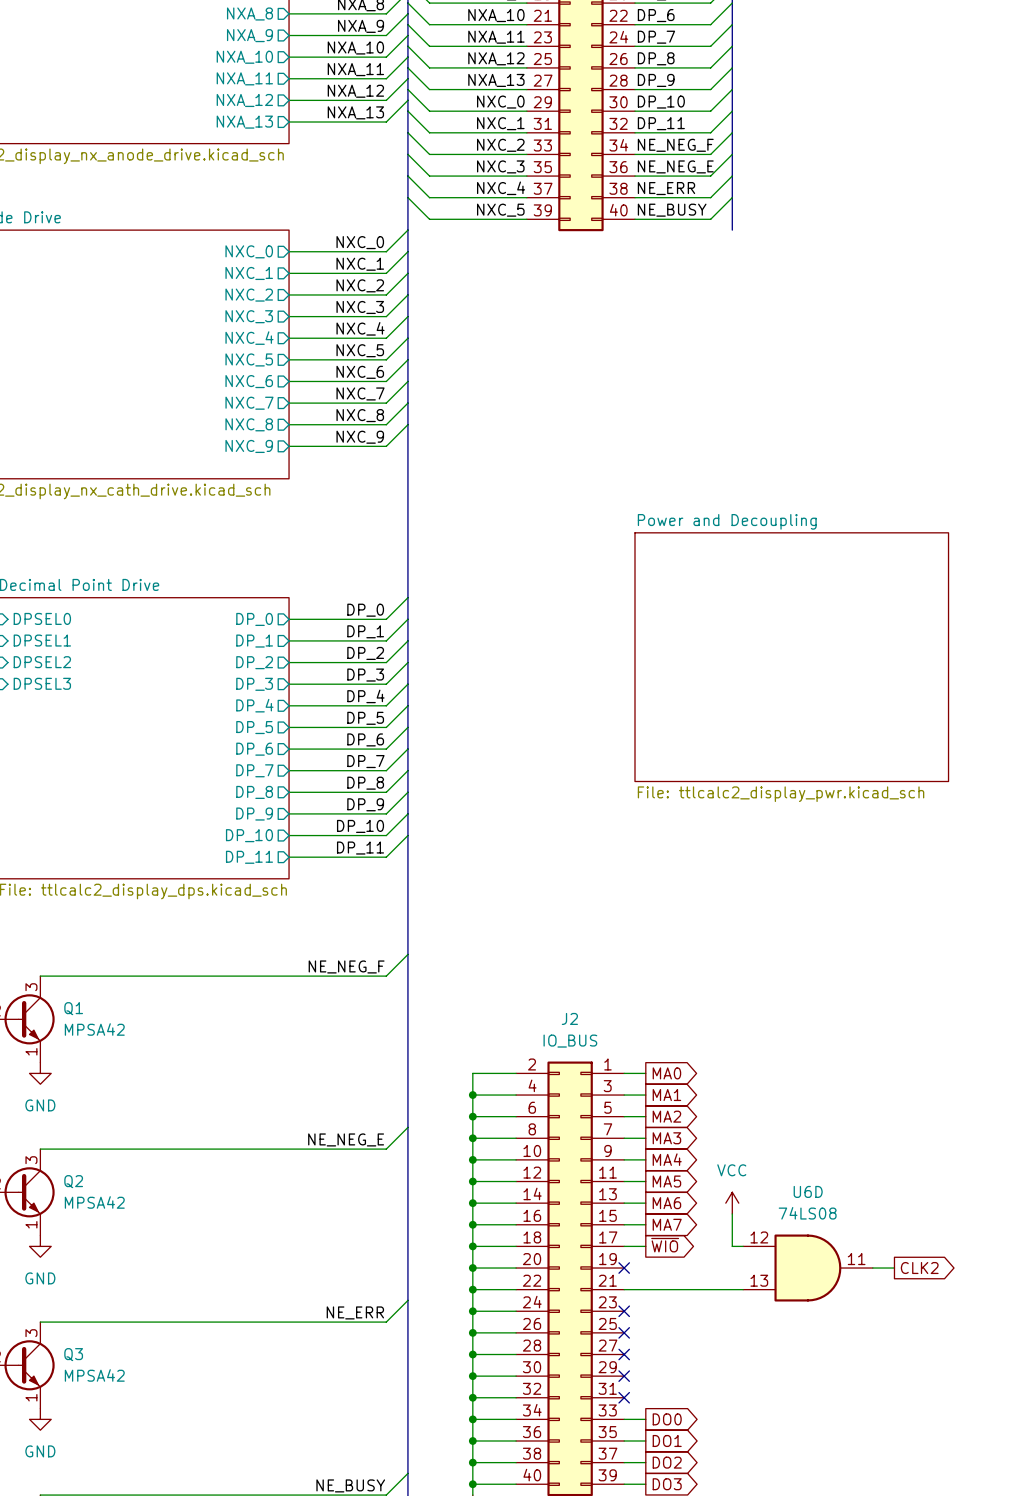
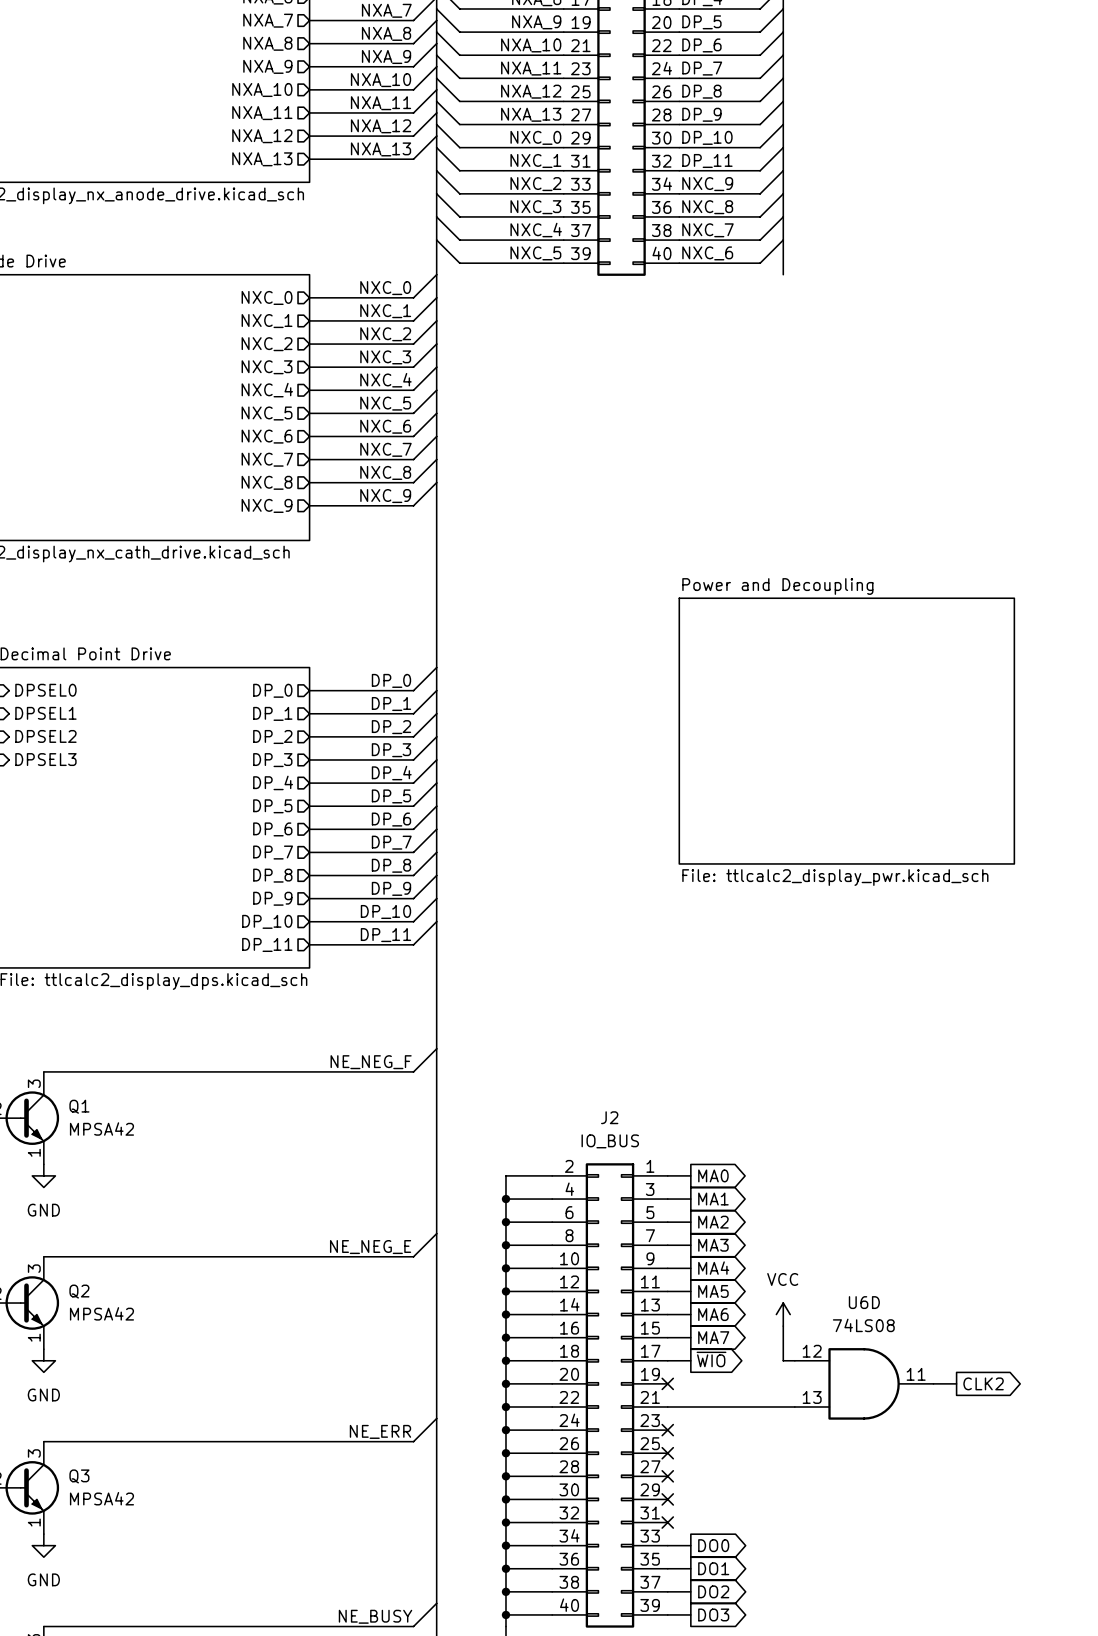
label: NE_NEG_F (675, 145) -> NXC_9 (707, 184)
label: NE_NEG_E (675, 166) -> NXC_8 (707, 207)
label: NE_ERR (666, 188) -> NXC_7 (707, 230)
label: NE_BUSY (672, 210) -> NXC_6 (707, 253)

